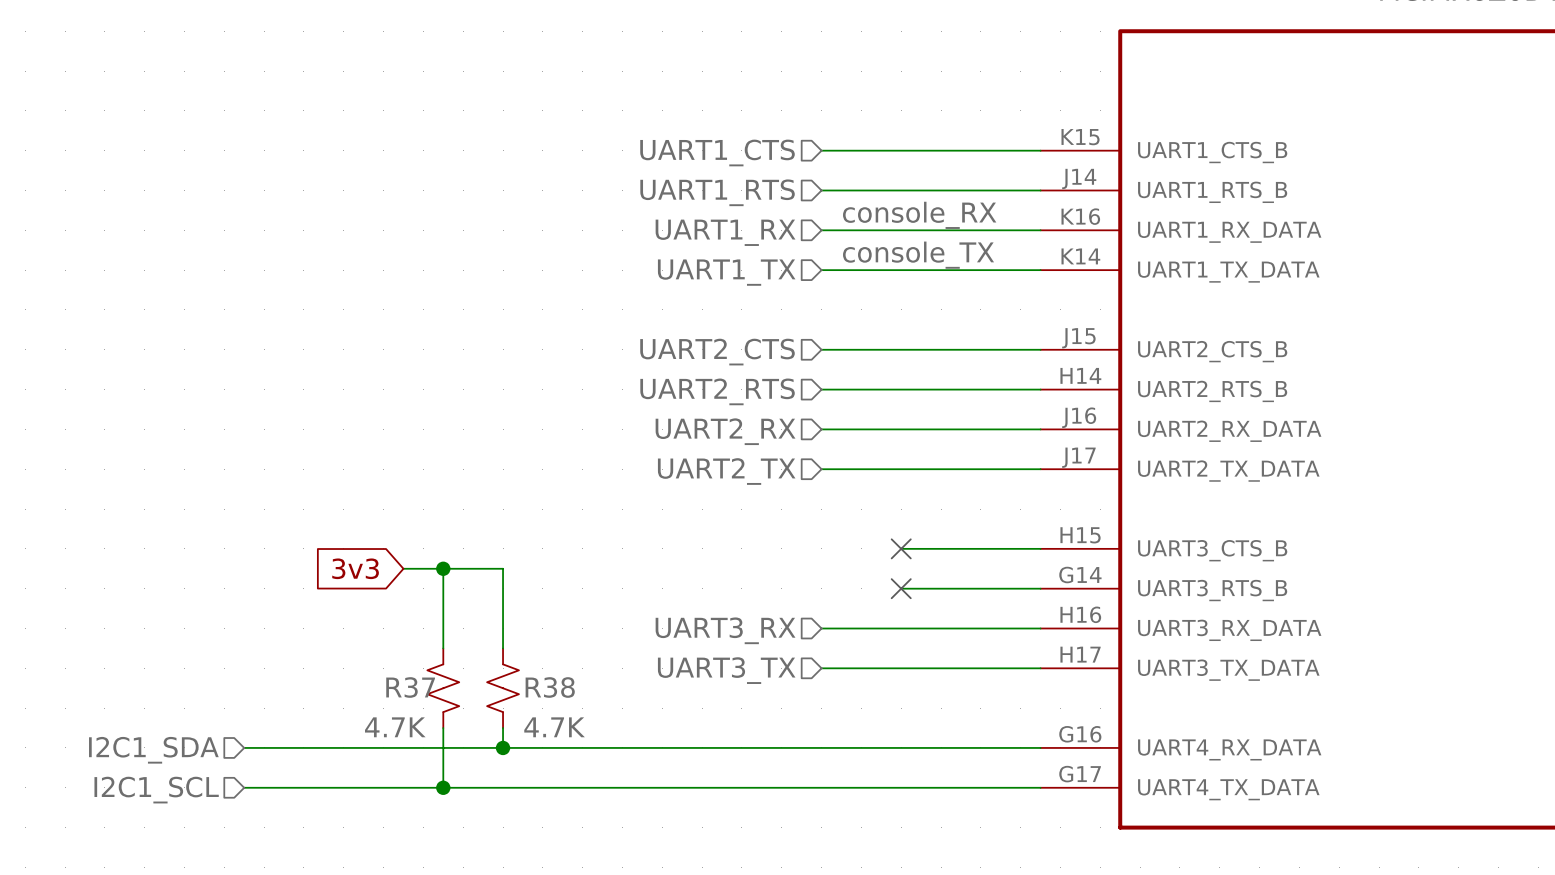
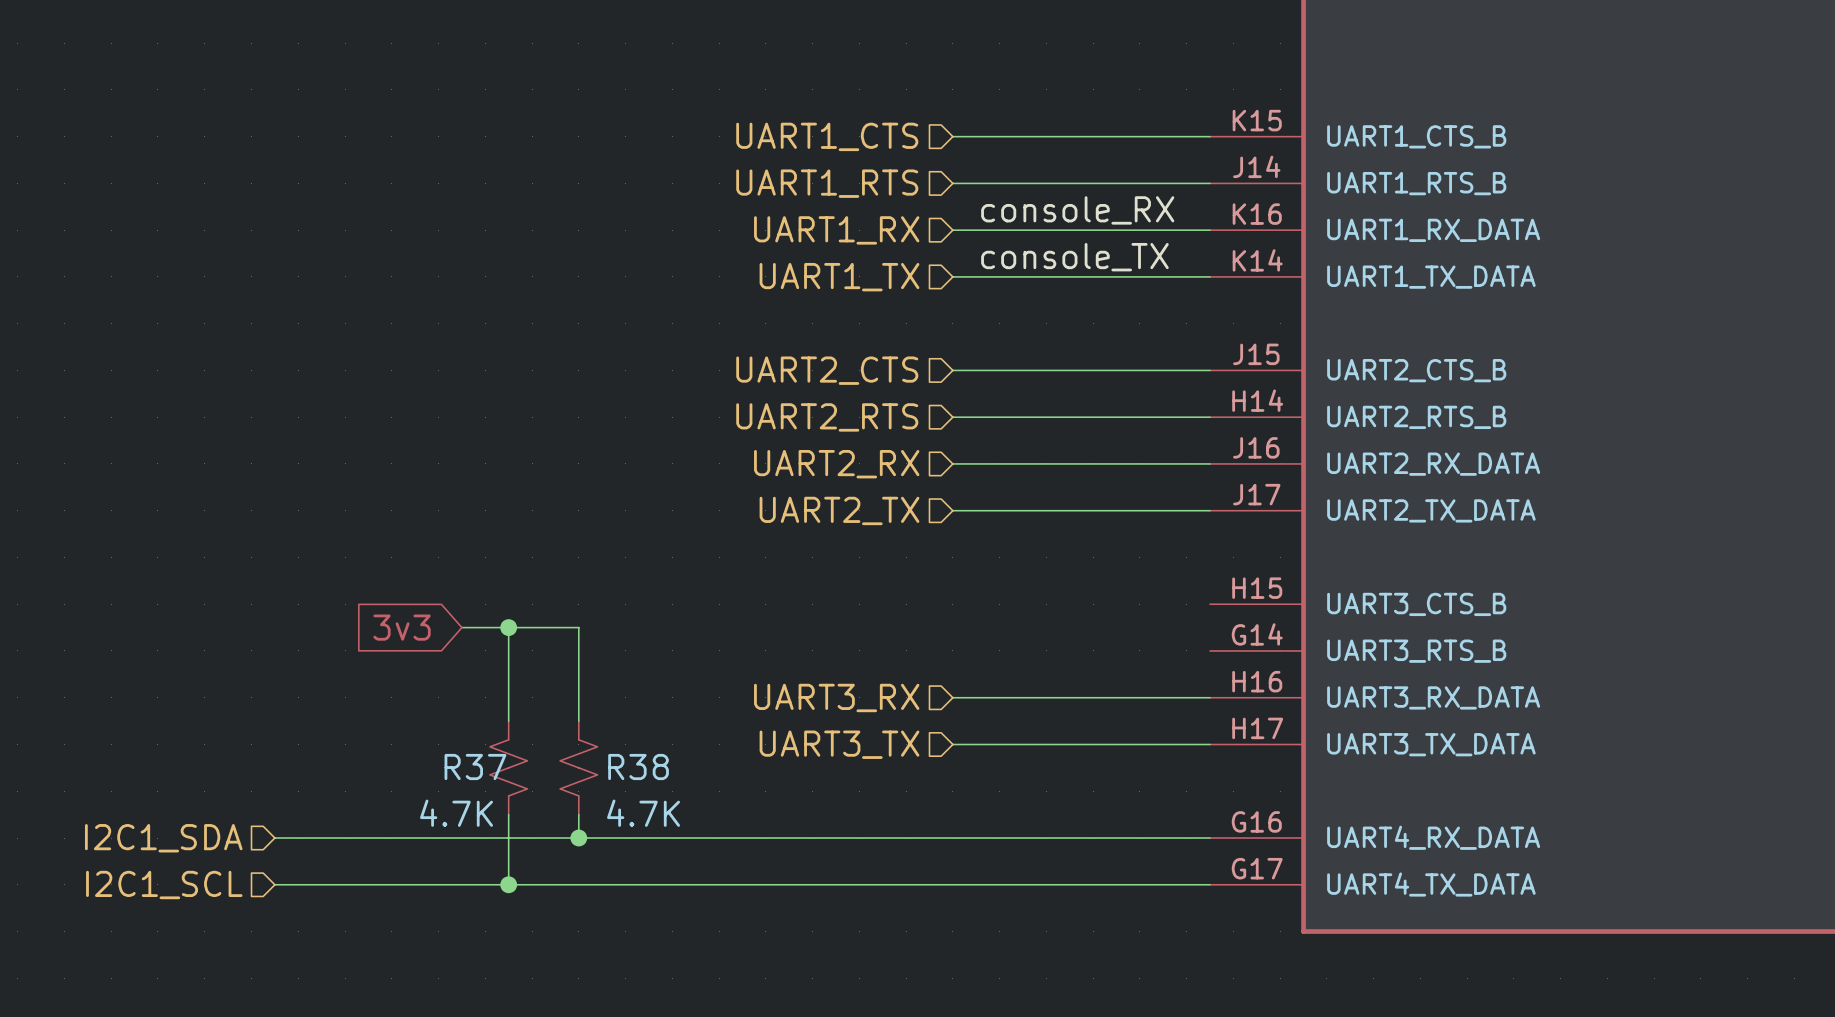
wire: (901, 548) (1040, 548) -> none
no-connect mark: (901, 548) -> none
wire: (901, 588) (1040, 588) -> none
no-connect mark: (901, 588) -> none

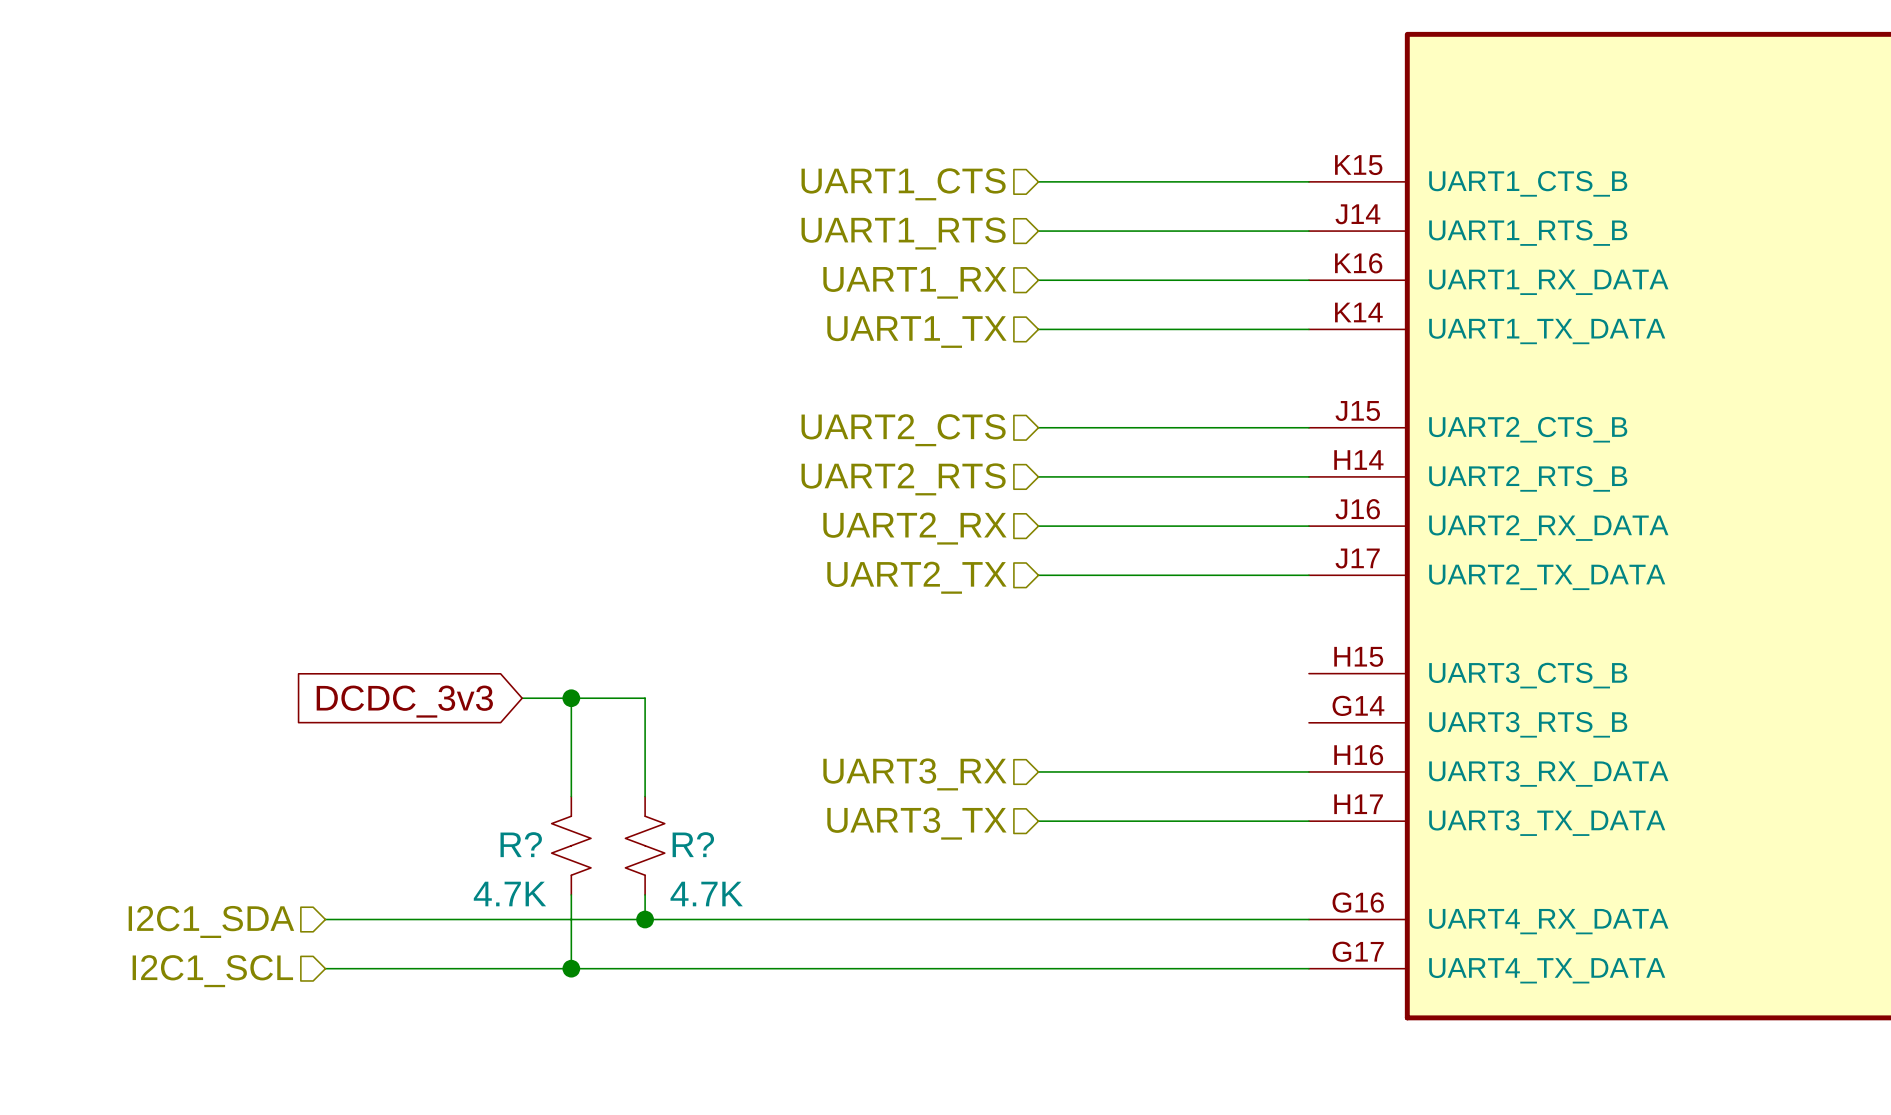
label: console_RX (1077, 210) -> none
label: console_TX (1074, 257) -> none
global label: 3v3 (402, 627) -> DCDC_3v3 (404, 701)
R37 name: R37 (475, 767) -> R? (521, 844)
R38 name: R38 (638, 767) -> R? (693, 844)

